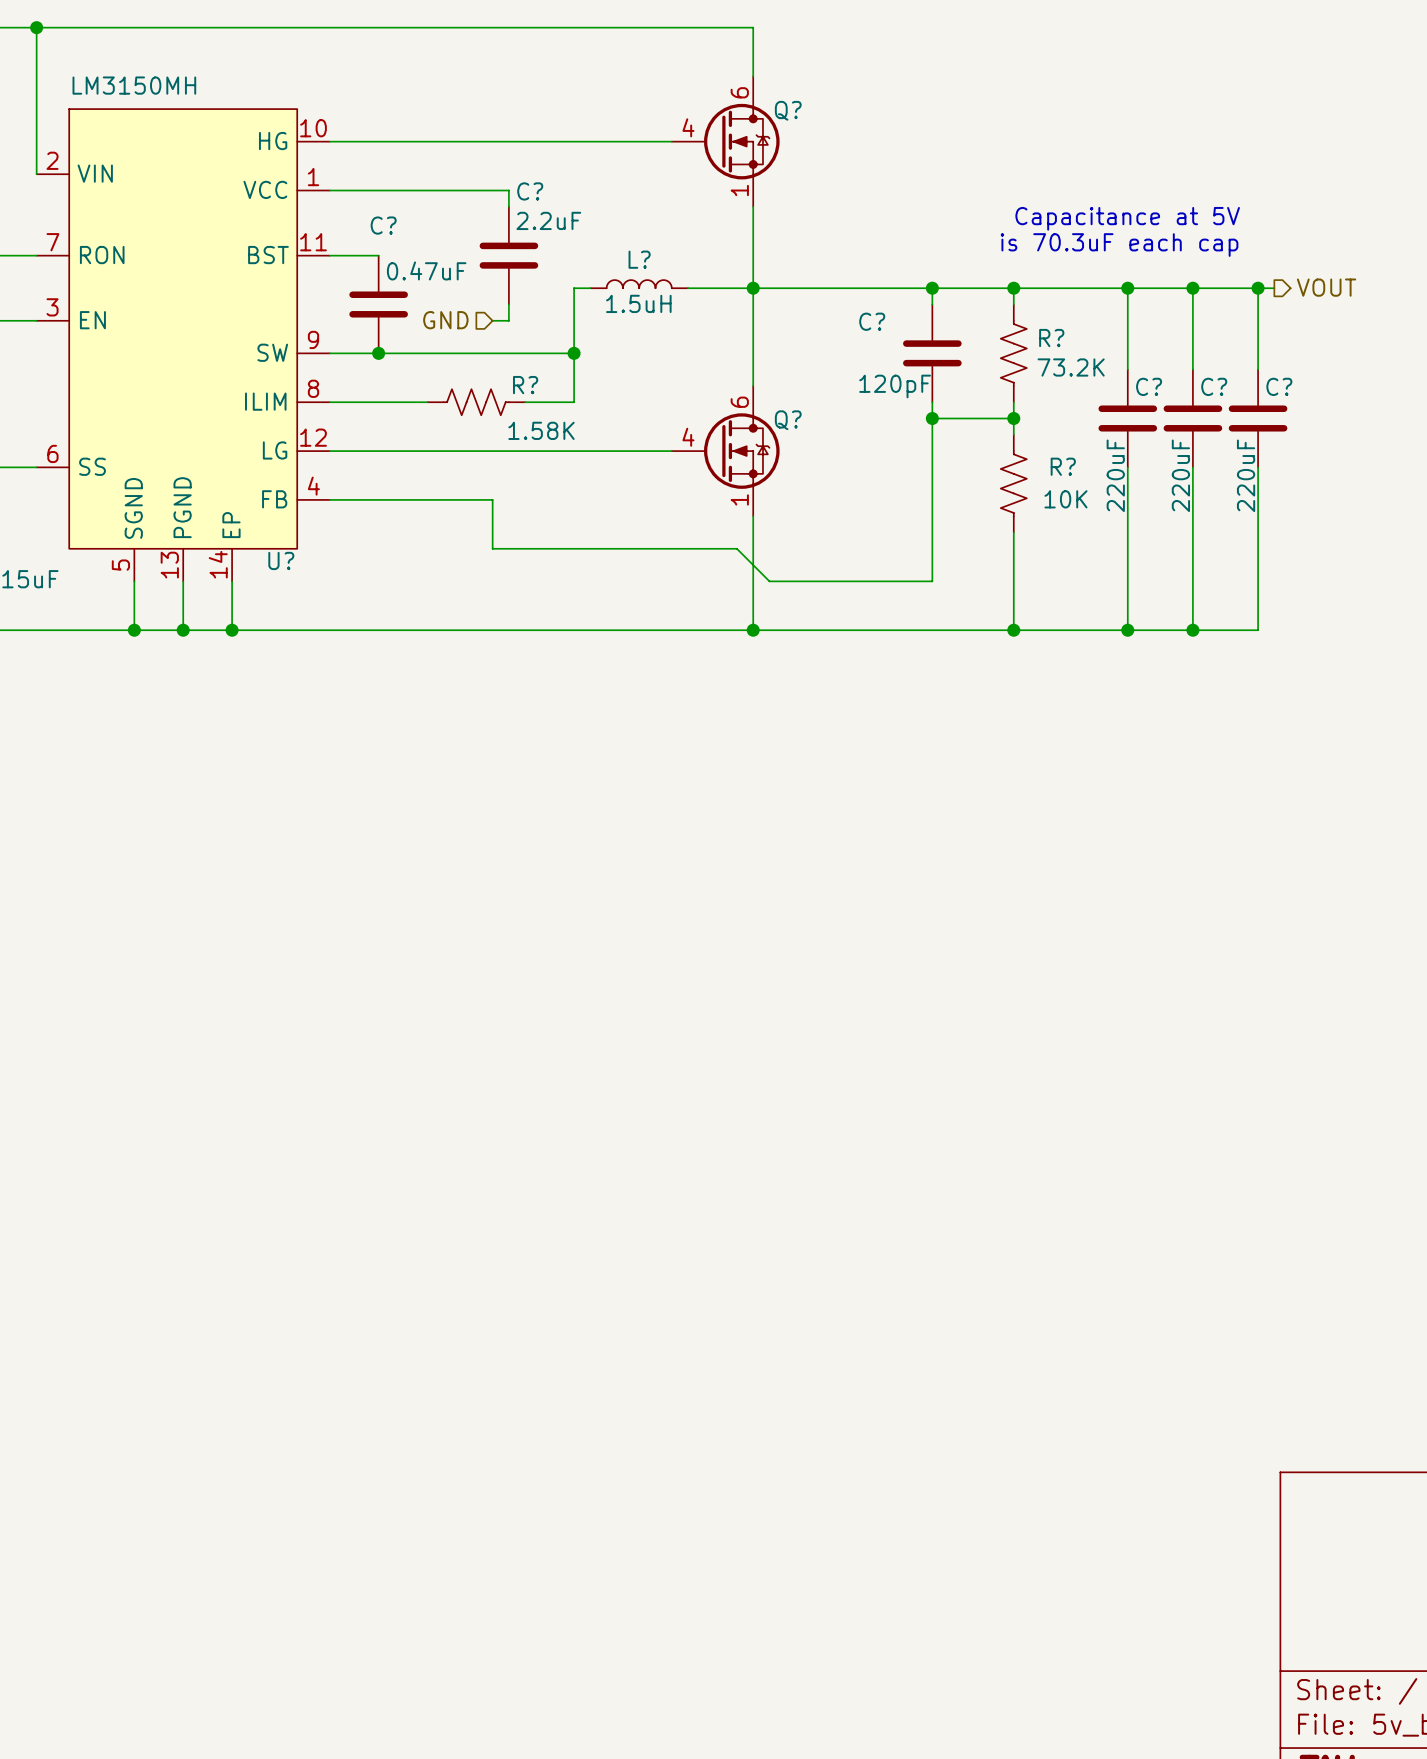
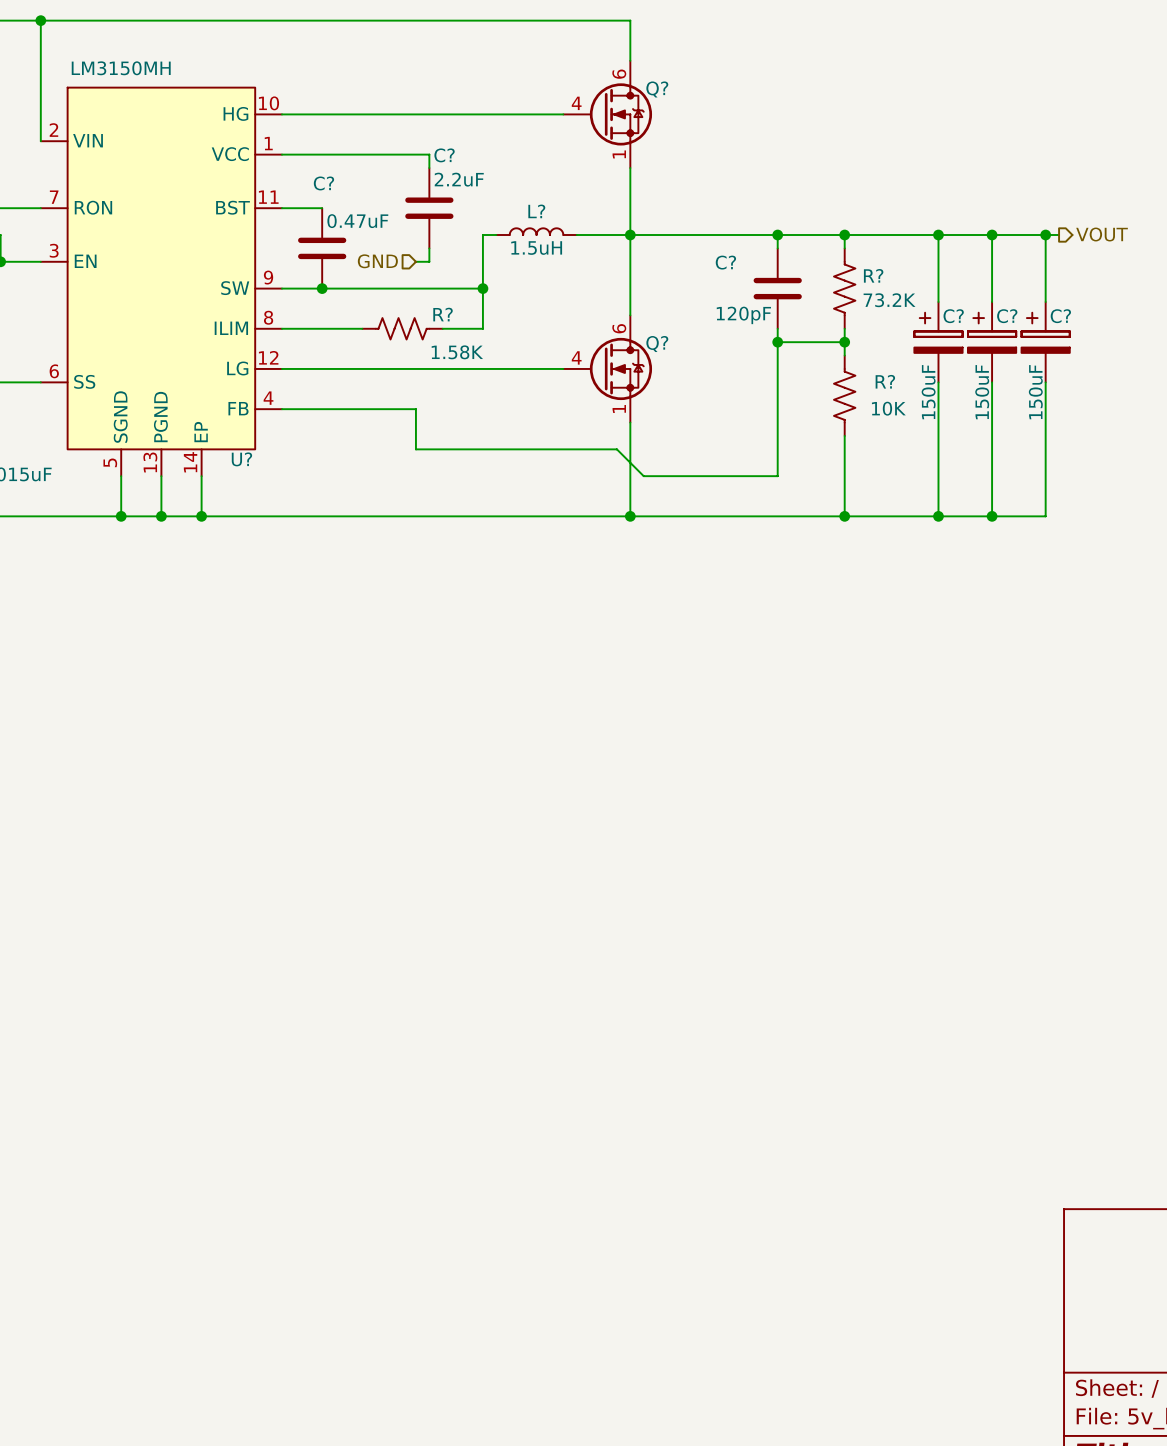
text: Capacitance at 5V (1127, 218) -> none
text: is 70.3uF each cap (1119, 245) -> none
C? symbol: [1098, 369, 1158, 468] -> [914, 301, 963, 383]
C? symbol: [1163, 369, 1223, 468] -> [967, 301, 1017, 383]
C? symbol: [1228, 369, 1288, 468] -> [1021, 301, 1070, 383]
C? text: 220uF (1115, 475) -> 150uF (928, 392)
C? text: 220uF (1180, 475) -> 150uF (982, 392)
C? text: 220uF (1246, 475) -> 150uF (1035, 392)

